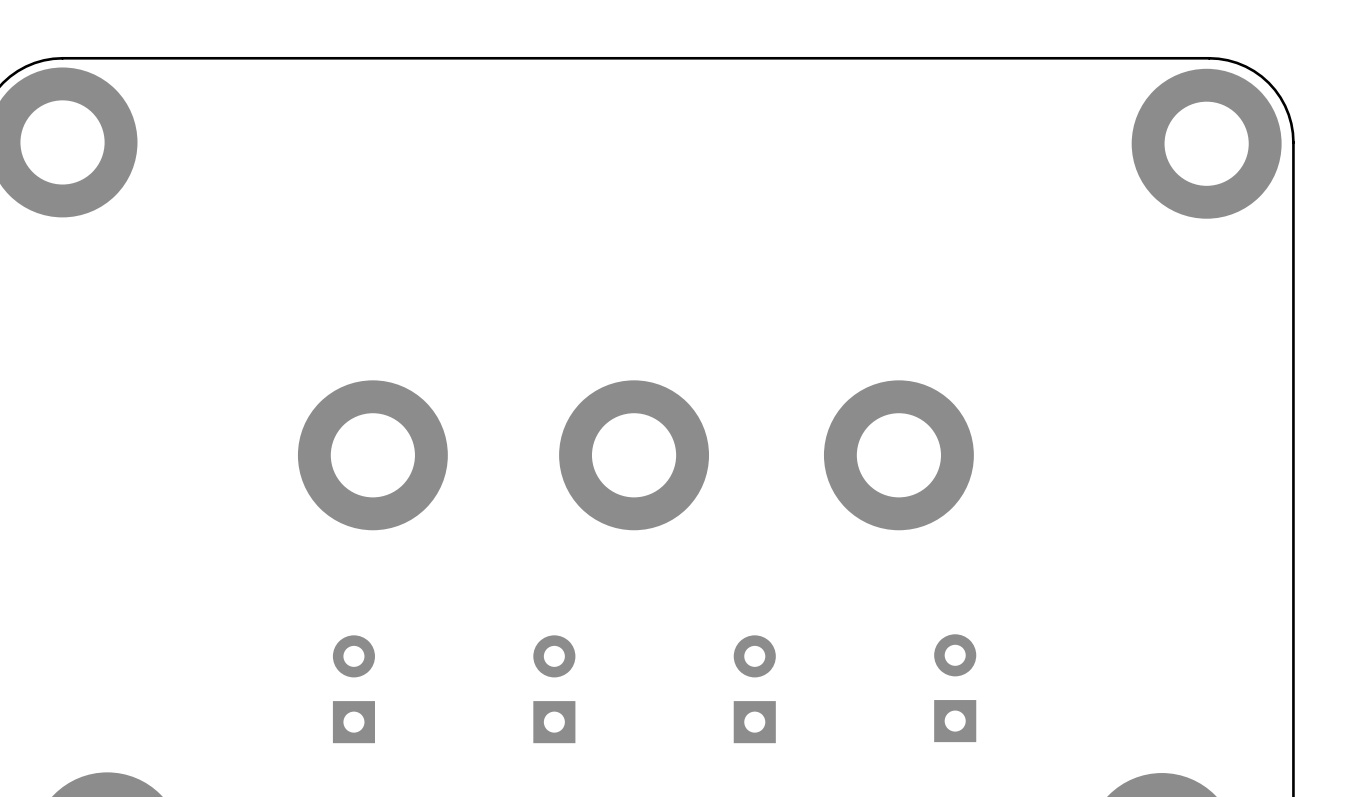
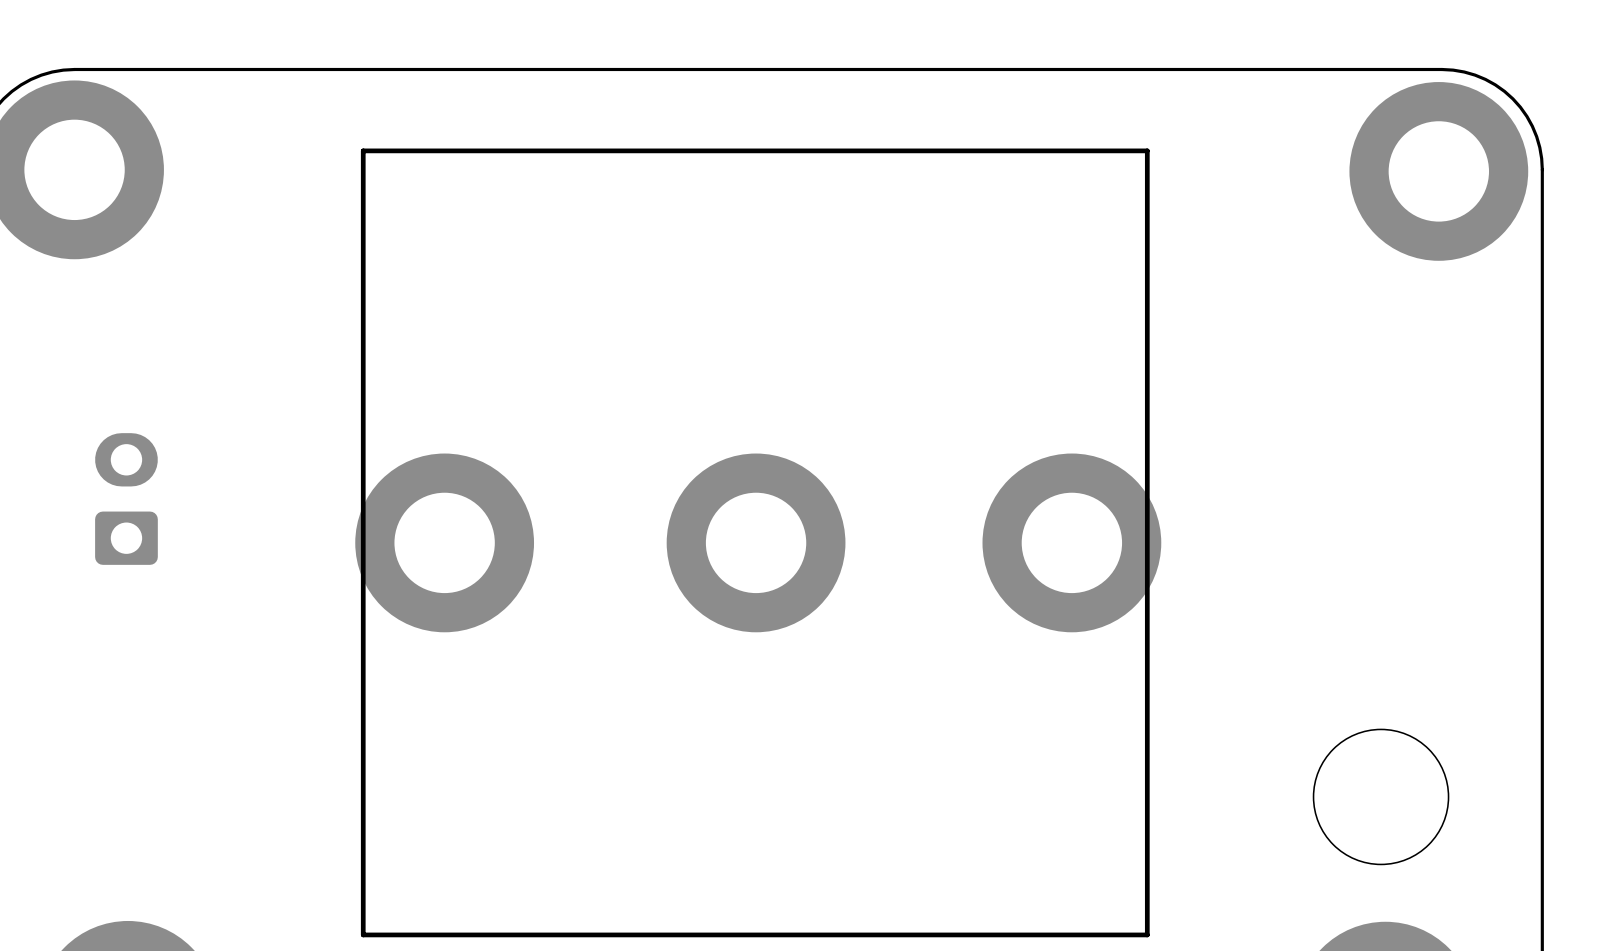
board edge: none -> (1147, 150) (363, 150) (363, 934) (1147, 934) (1147, 150)
part: none -> (126, 499)
round board edge: none -> [1312, 728, 1450, 866]
part: (955, 688) -> none
part: (353, 689) -> none
part: (554, 689) -> none
part: (754, 689) -> none

